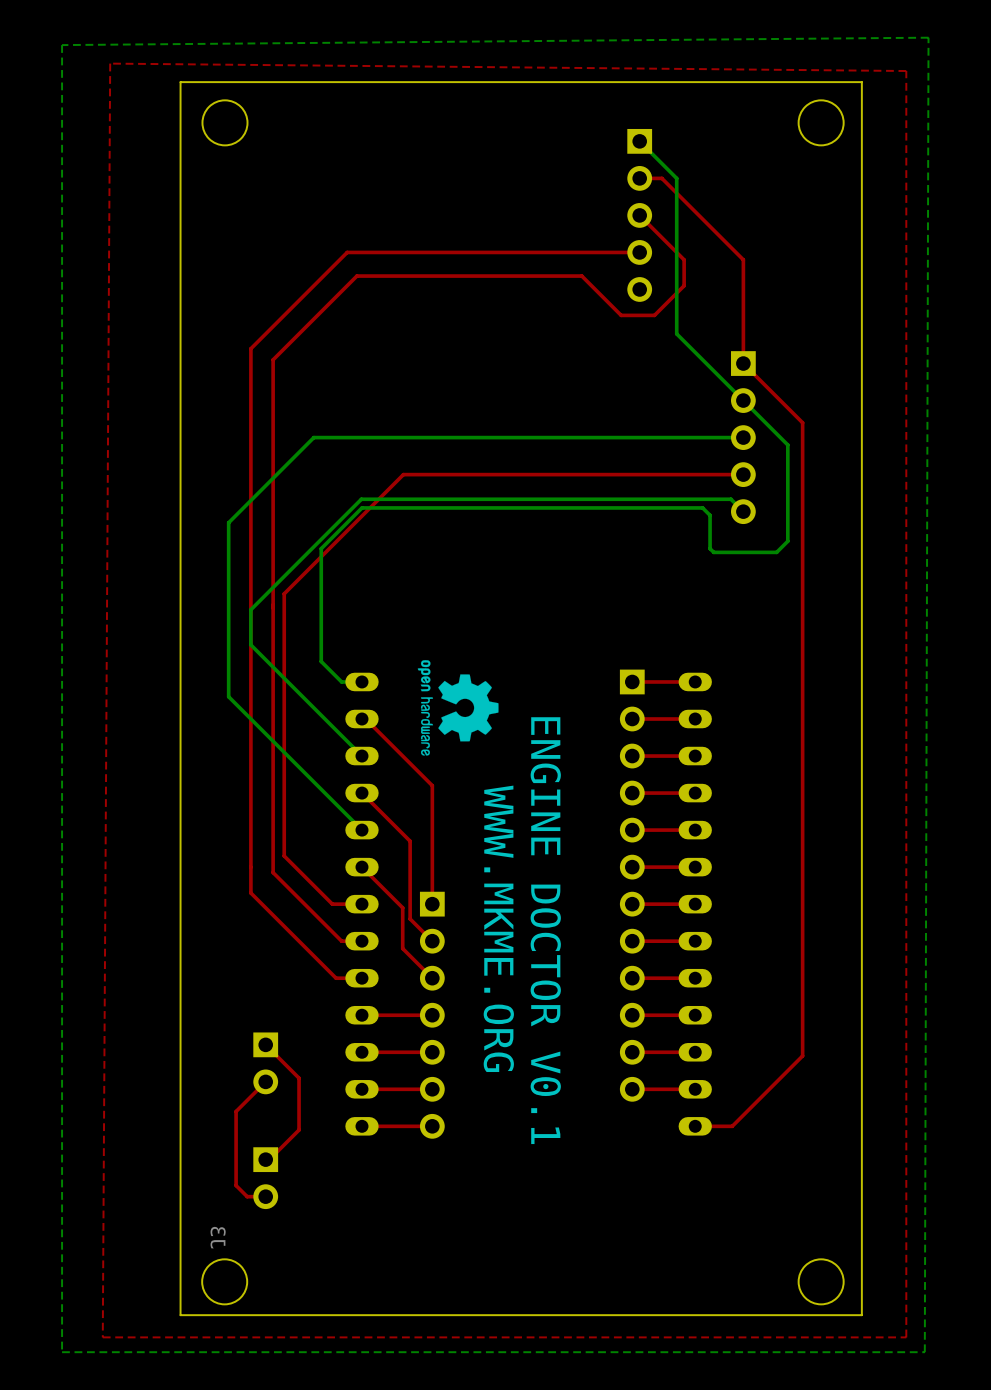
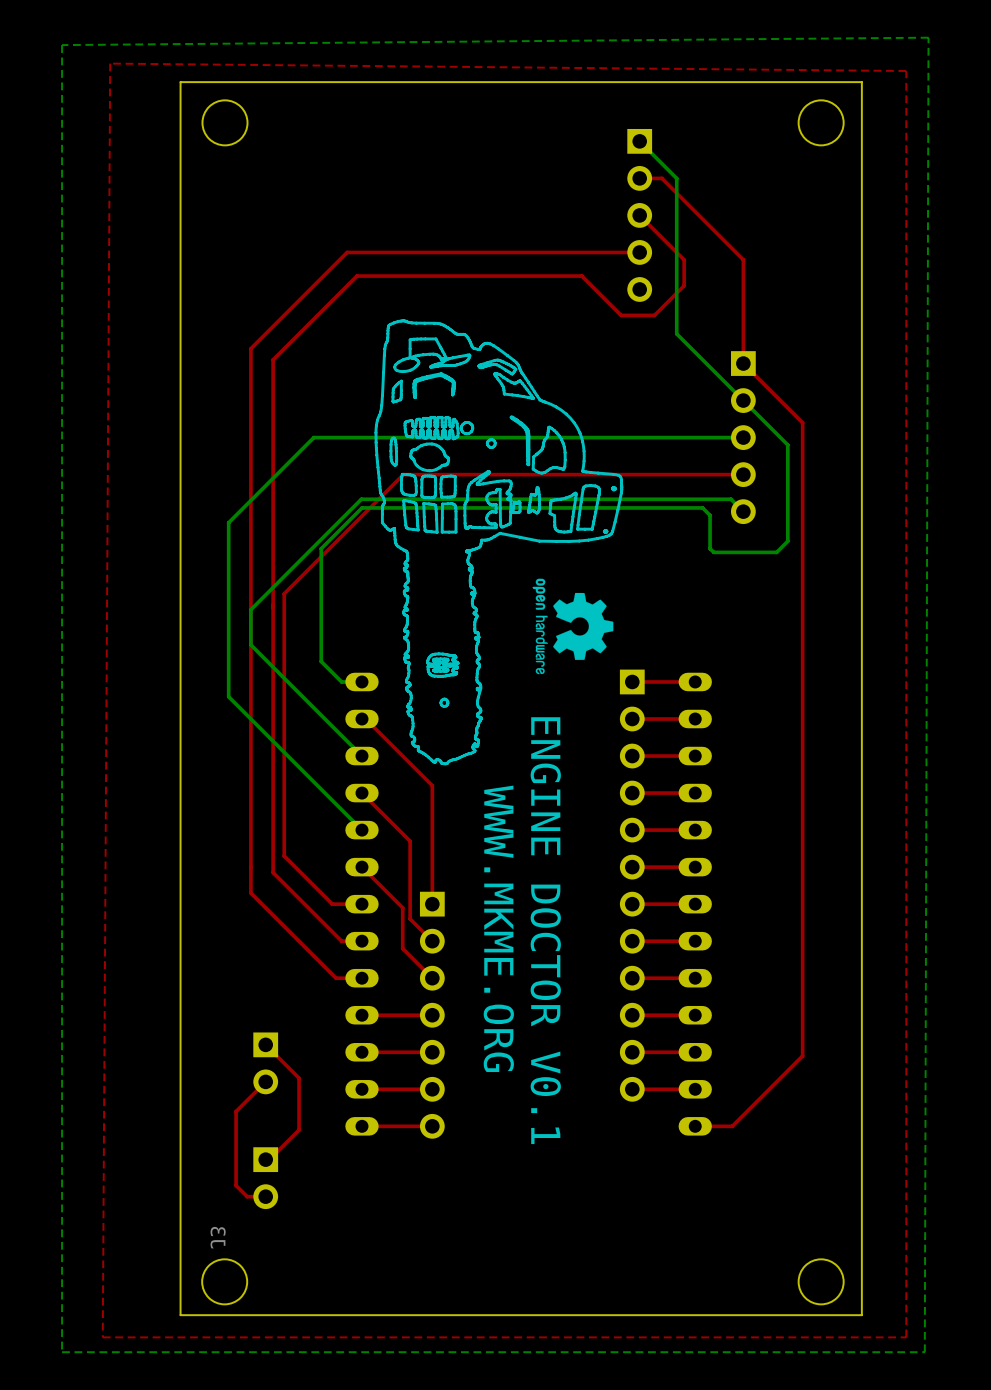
line: none -> (404, 320) (440, 324) (456, 334) (465, 335) (474, 348) (479, 349) (482, 344) (487, 343) (498, 348) (517, 363) (540, 399) (561, 410) (574, 422) (579, 433) (583, 446) (582, 471) (616, 474) (621, 479) (621, 491) (617, 509) (612, 531) (609, 535) (588, 540) (556, 541) (539, 541) (500, 533) (488, 539) (481, 540) (479, 547) (466, 551) (469, 553) (468, 562) (472, 567) (469, 569) (472, 571) (470, 585) (474, 591) (474, 593) (471, 593) (474, 595) (472, 605) (476, 609) (474, 613) (477, 615) (474, 631) (479, 637) (475, 638) (478, 640) (476, 649) (479, 658) (477, 661) (479, 666) (476, 680) (480, 687) (480, 689) (477, 688) (479, 690) (477, 702) (480, 710) (477, 715) (481, 718) (475, 736) (478, 740) (477, 745) (476, 746) (474, 743) (472, 746) (474, 751) (446, 763) (441, 763) (437, 759) (433, 761) (418, 750) (418, 746) (412, 743) (414, 739) (410, 734) (412, 719) (407, 711) (411, 709) (407, 706) (411, 695) (406, 688) (410, 685) (406, 681) (409, 663) (404, 658) (408, 657) (405, 654) (408, 647) (407, 641) (404, 637) (407, 633) (404, 630) (407, 617) (403, 612) (407, 609) (405, 607) (407, 596) (404, 591) (407, 589) (405, 586) (408, 581) (407, 572) (404, 568) (407, 566) (404, 563) (407, 559) (407, 554) (406, 551) (396, 544) (394, 528) (389, 530) (382, 522) (384, 501) (380, 490) (376, 425) (381, 405) (384, 348) (388, 326) (395, 322) (404, 320)
line: none -> (435, 338) (445, 357) (441, 359) (434, 354) (417, 355) (412, 357) (418, 362) (413, 368) (403, 371) (395, 369) (397, 363) (410, 357) (410, 339) (435, 338)
line: none -> (469, 354) (448, 358) (430, 366) (460, 363) (467, 360) (469, 356) (469, 354)
line: none -> (497, 360) (515, 369) (513, 373) (496, 364) (479, 366) (497, 360)
line: none -> (441, 373) (415, 380) (414, 397) (416, 381) (440, 375) (453, 382) (452, 394) (453, 382) (441, 373)
line: none -> (495, 373) (513, 382) (520, 380) (533, 398) (504, 394) (502, 386) (495, 373)
line: none -> (401, 381) (400, 399) (393, 401) (393, 389) (401, 381)
line: none -> (445, 417) (449, 418) (450, 426) (452, 426) (453, 419) (456, 422) (458, 434) (454, 438) (451, 430) (448, 438) (445, 438) (444, 430) (441, 438) (438, 437) (436, 430) (434, 438) (430, 437) (429, 430) (426, 437) (423, 437) (421, 430) (419, 437) (416, 436) (415, 430) (412, 431) (412, 436) (406, 435) (406, 421) (412, 420) (412, 426) (415, 426) (416, 420) (419, 419) (421, 427) (423, 418) (427, 418) (429, 427) (430, 417) (434, 417) (436, 427) (437, 417) (442, 417) (442, 425) (444, 427) (445, 417)
line: none -> (511, 417) (521, 423) (528, 431) (528, 464) (526, 431) (522, 425) (512, 418) (511, 417) (511, 417)
line: none -> (467, 422) (463, 423) (461, 427) (463, 432) (466, 433) (470, 432) (472, 428) (471, 424) (467, 422)
line: none -> (549, 427) (558, 434) (563, 443) (564, 467) (563, 469) (553, 467) (539, 472) (533, 469) (533, 456) (542, 449) (548, 427) (549, 427) (549, 427)
line: none -> (393, 438) (391, 442) (391, 458) (395, 465) (396, 448) (393, 438)
line: none -> (492, 439) (490, 439) (489, 440) (487, 442) (490, 447) (495, 444) (492, 439)
line: none -> (431, 444) (421, 445) (411, 452) (411, 457) (415, 464) (424, 469) (434, 470) (446, 464) (448, 461) (448, 458) (441, 449) (436, 445) (431, 444)
line: none -> (488, 471) (473, 481) (468, 486) (464, 506) (466, 528) (470, 526) (496, 527) (495, 524) (489, 523) (486, 518) (490, 512) (496, 512) (496, 504) (490, 504) (486, 498) (488, 494) (495, 492) (497, 489) (500, 489) (501, 526) (510, 523) (511, 500) (507, 499) (511, 495) (507, 493) (511, 482) (500, 481) (477, 484) (488, 473) (489, 472) (489, 471) (488, 471)
line: none -> (402, 474) (402, 492) (414, 495) (416, 491) (414, 476) (402, 474)
line: none -> (429, 476) (435, 477) (435, 495) (432, 497) (423, 497) (422, 478) (423, 476) (429, 476)
line: none -> (450, 476) (441, 477) (441, 497) (454, 495) (455, 476) (450, 476)
line: none -> (590, 485) (583, 488) (577, 529) (592, 529) (599, 491) (597, 486) (590, 485)
line: none -> (537, 487) (535, 494) (531, 494) (528, 512) (532, 510) (537, 512) (539, 510) (537, 487)
line: none -> (613, 487) (614, 489) (613, 487)
line: none -> (575, 493) (565, 498) (551, 500) (549, 513) (554, 515) (555, 527) (557, 530) (570, 531) (575, 493)
line: none -> (404, 500) (415, 503) (418, 529) (406, 527) (404, 500)
line: none -> (519, 501) (519, 511) (513, 512) (514, 502) (519, 501)
line: none -> (423, 503) (435, 505) (437, 532) (425, 530) (423, 503)
line: none -> (450, 503) (442, 504) (442, 532) (456, 532) (455, 506) (450, 503)
line: none -> (605, 530) (606, 531) (605, 532) (604, 531) (605, 530)
line: none -> (438, 653) (430, 656) (427, 663) (439, 663) (439, 661) (433, 659) (440, 658) (447, 659) (443, 661) (443, 663) (458, 663) (452, 660) (455, 657) (455, 655) (438, 653)
line: none -> (456, 672) (454, 674) (433, 675) (429, 672) (427, 666) (439, 666) (433, 670) (440, 671) (447, 670) (443, 668) (443, 666) (456, 666) (457, 667) (452, 670) (456, 672)
line: none -> (444, 699) (447, 702) (444, 706) (440, 702) (441, 700) (443, 699) (444, 699)
drawing position: (458, 707) -> (572, 626)

